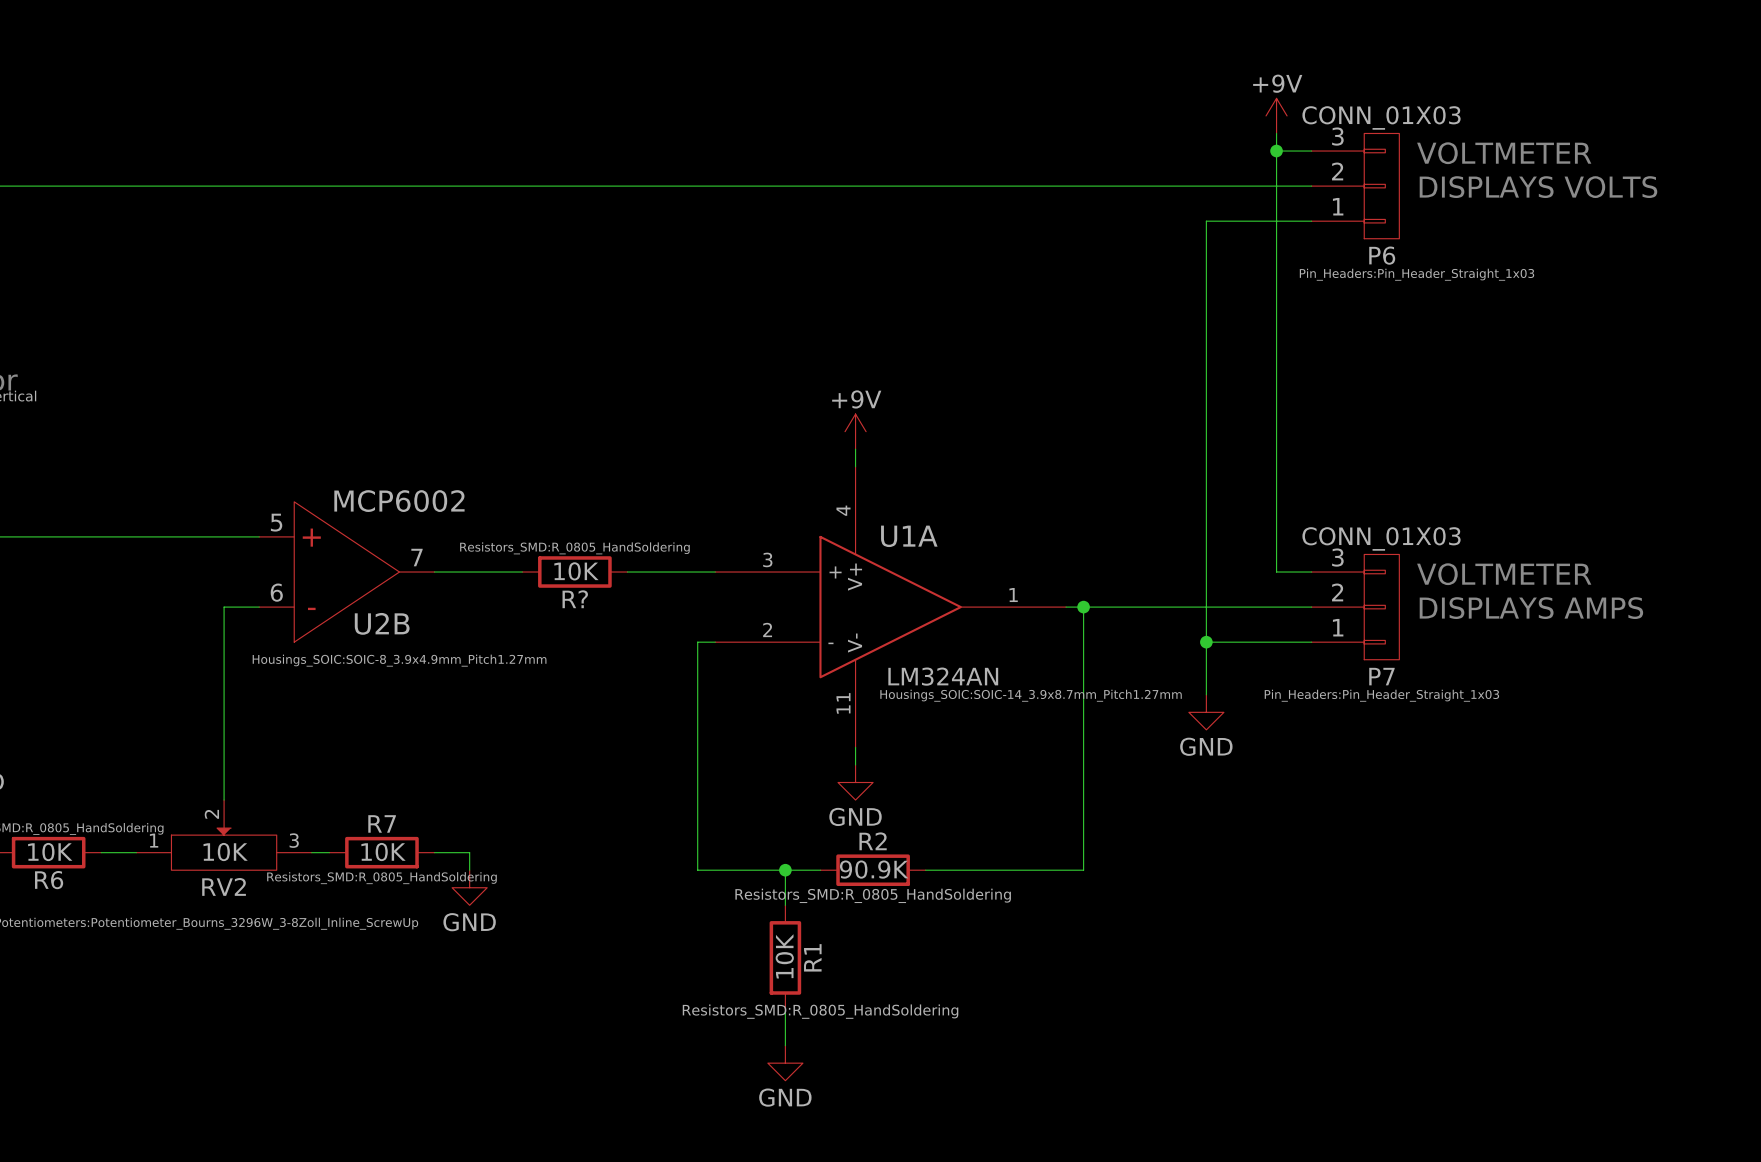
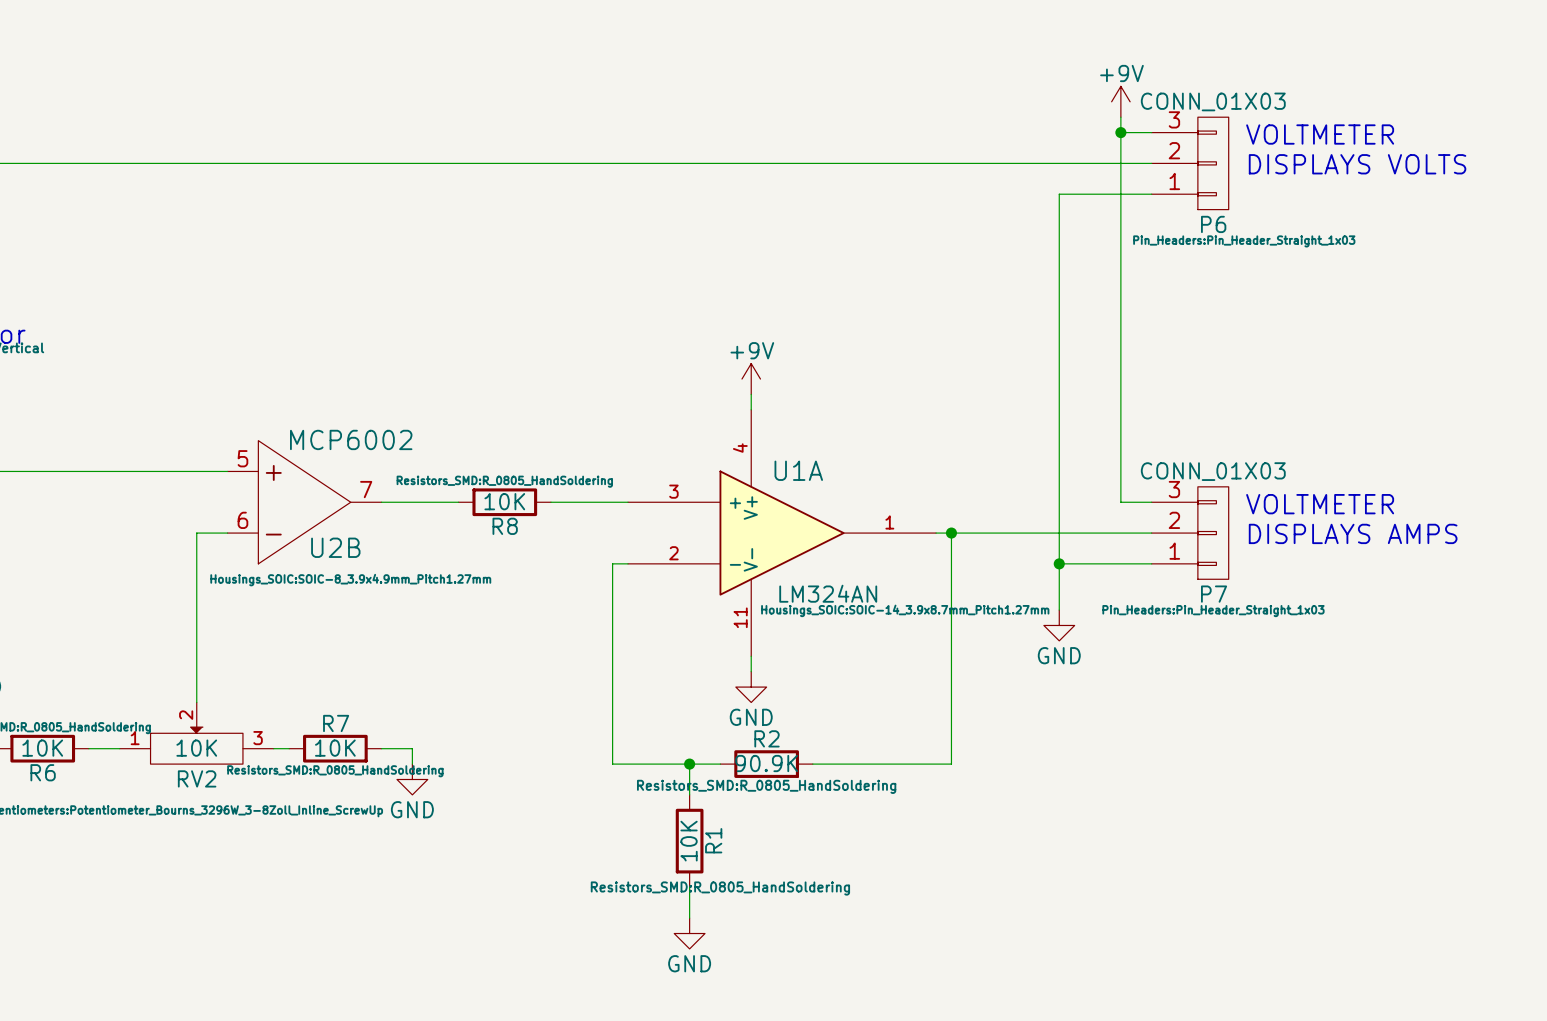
R? name: R? (575, 599) -> R8 (505, 526)

